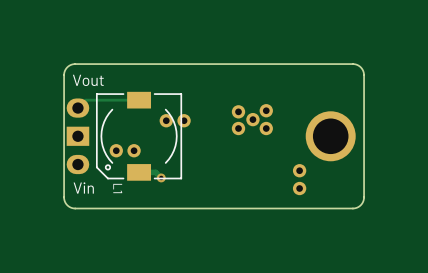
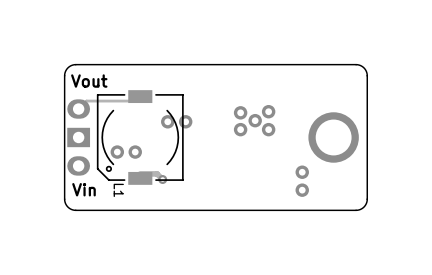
L1 footprint: [96, 91, 183, 181] -> [96, 90, 184, 185]

